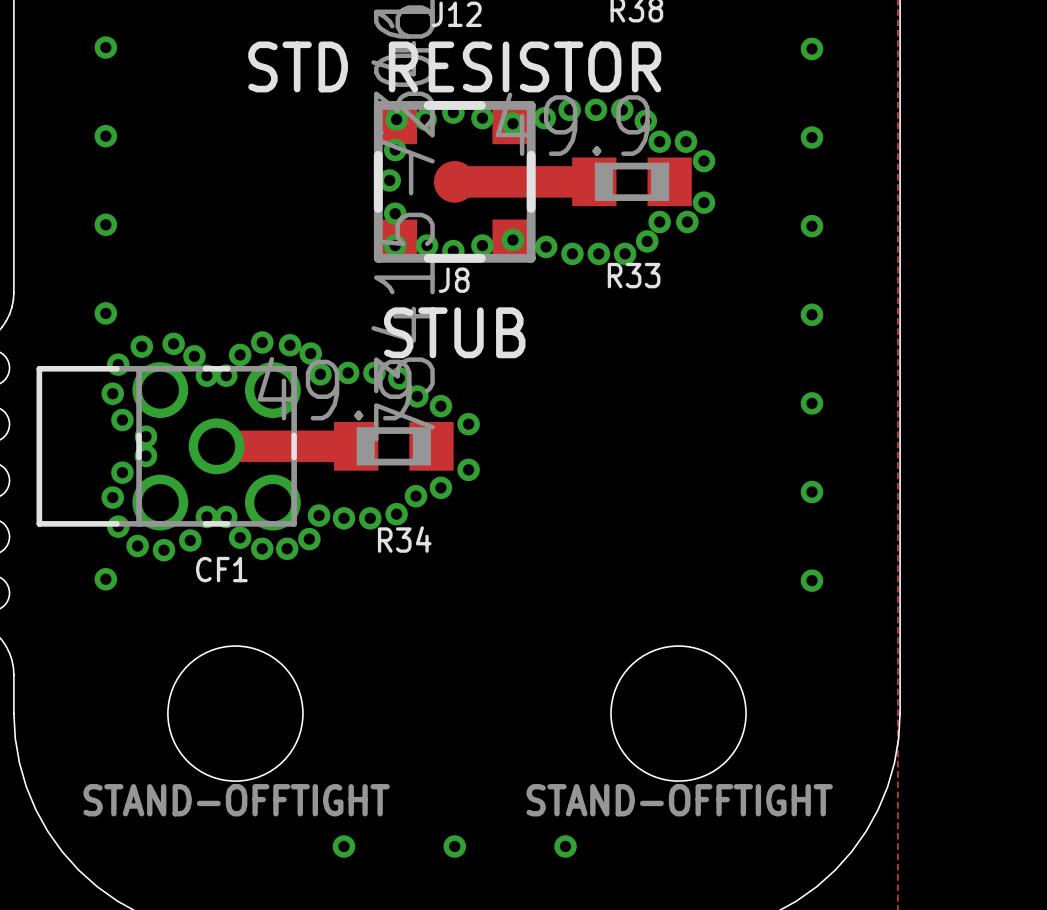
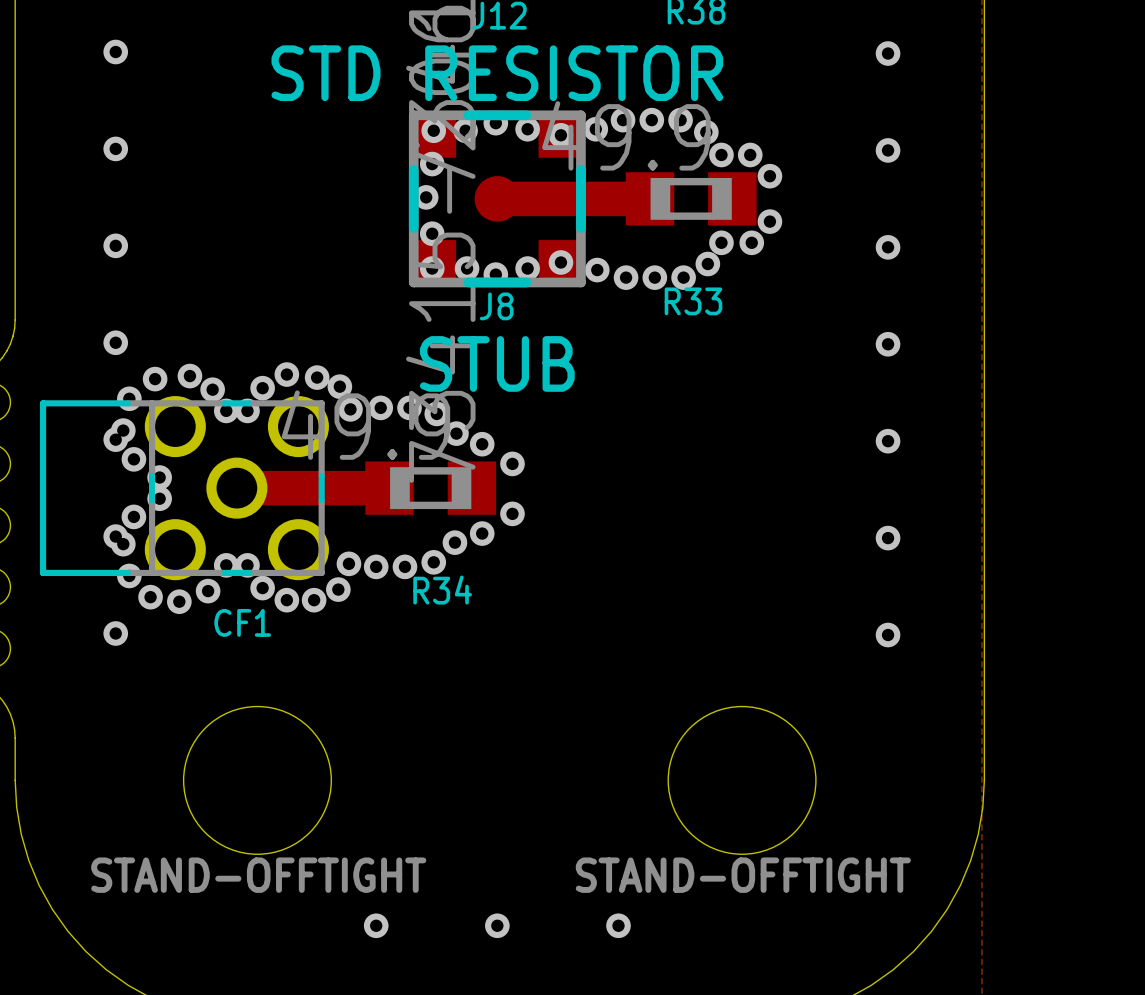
via: none -> (115, 439)
via: none -> (115, 536)

